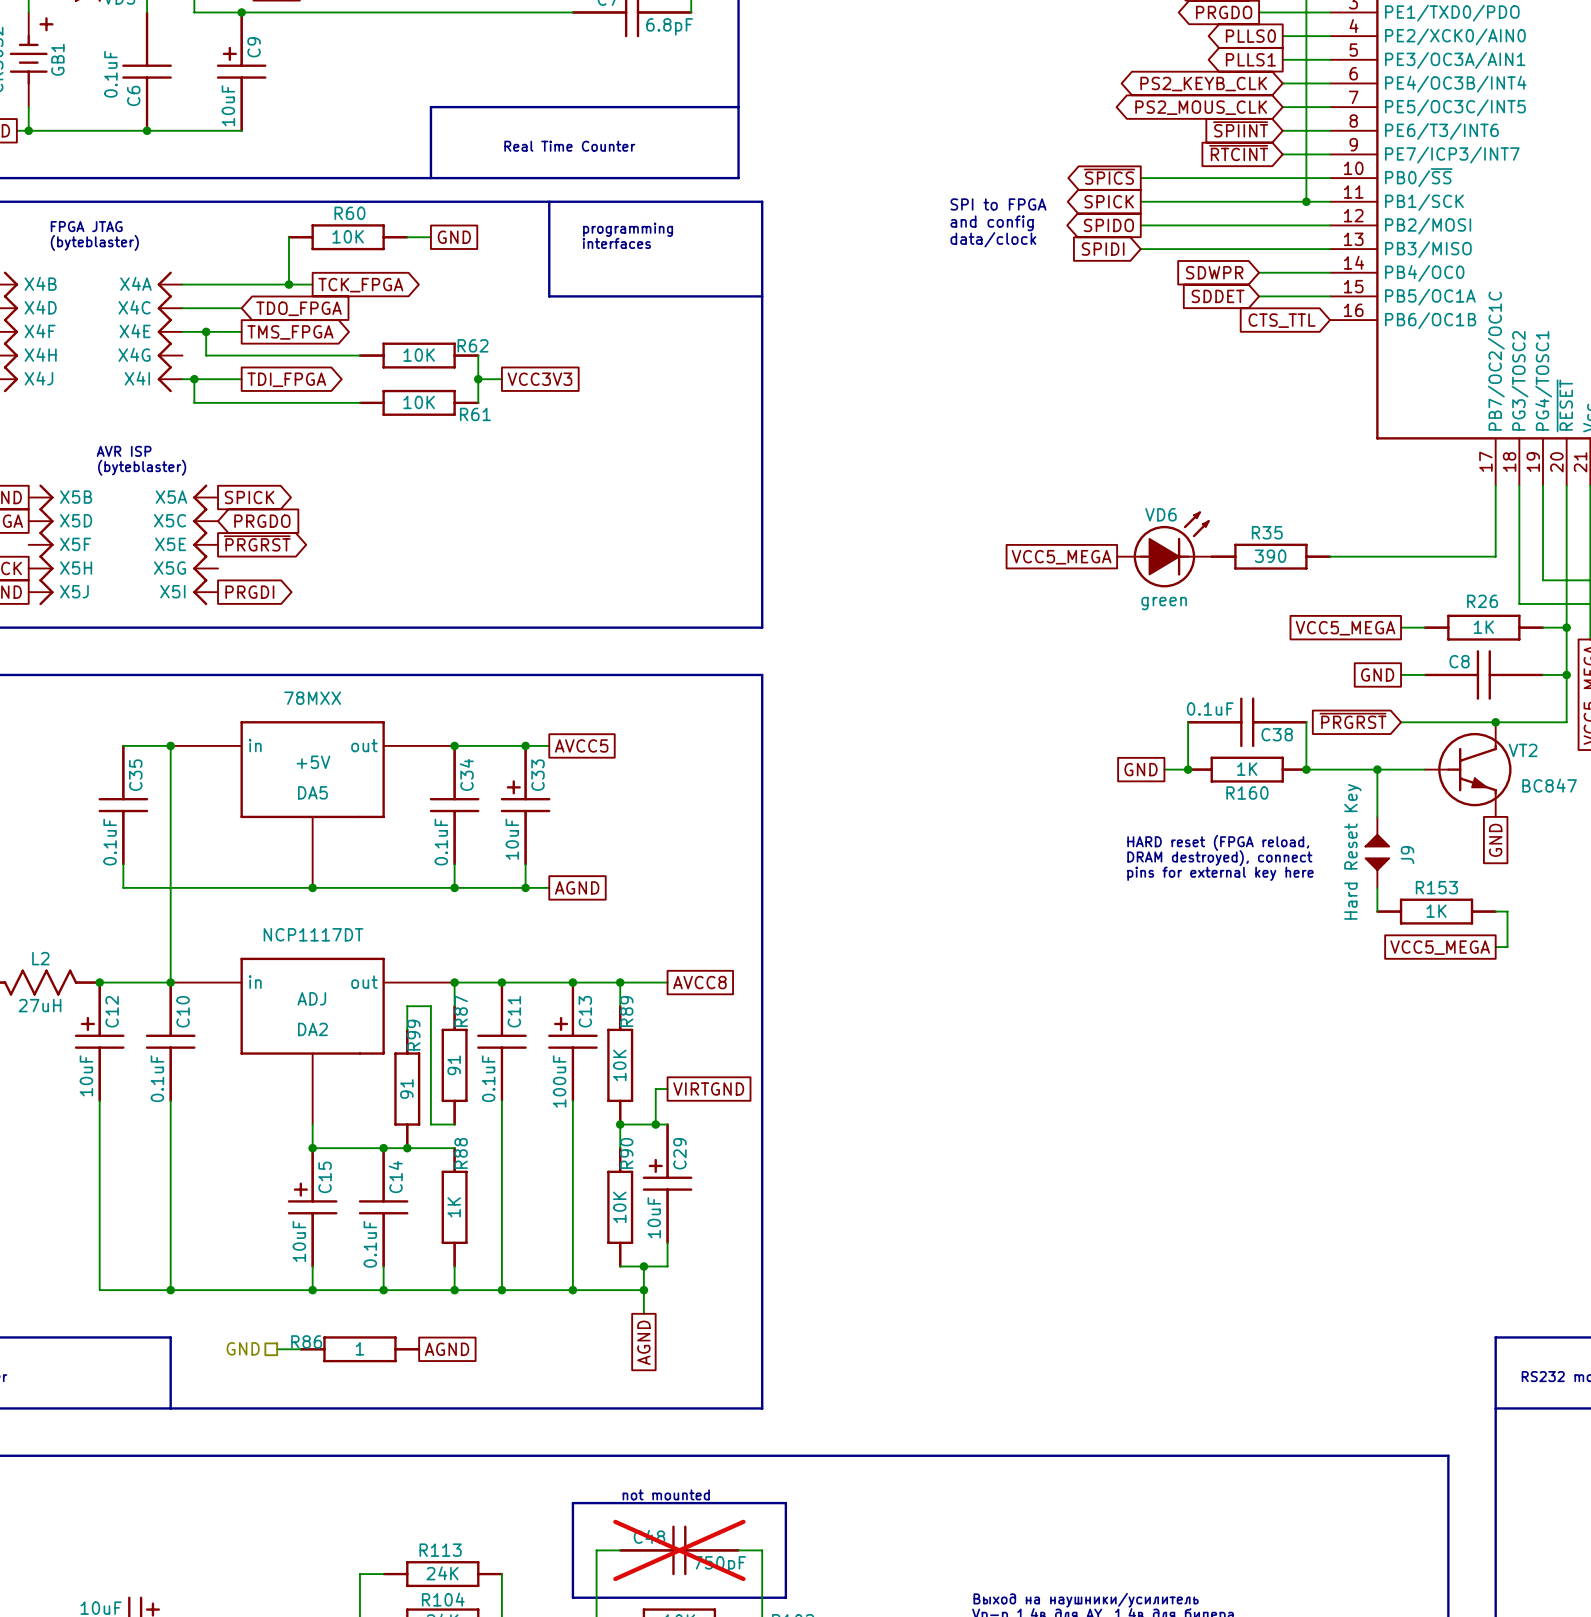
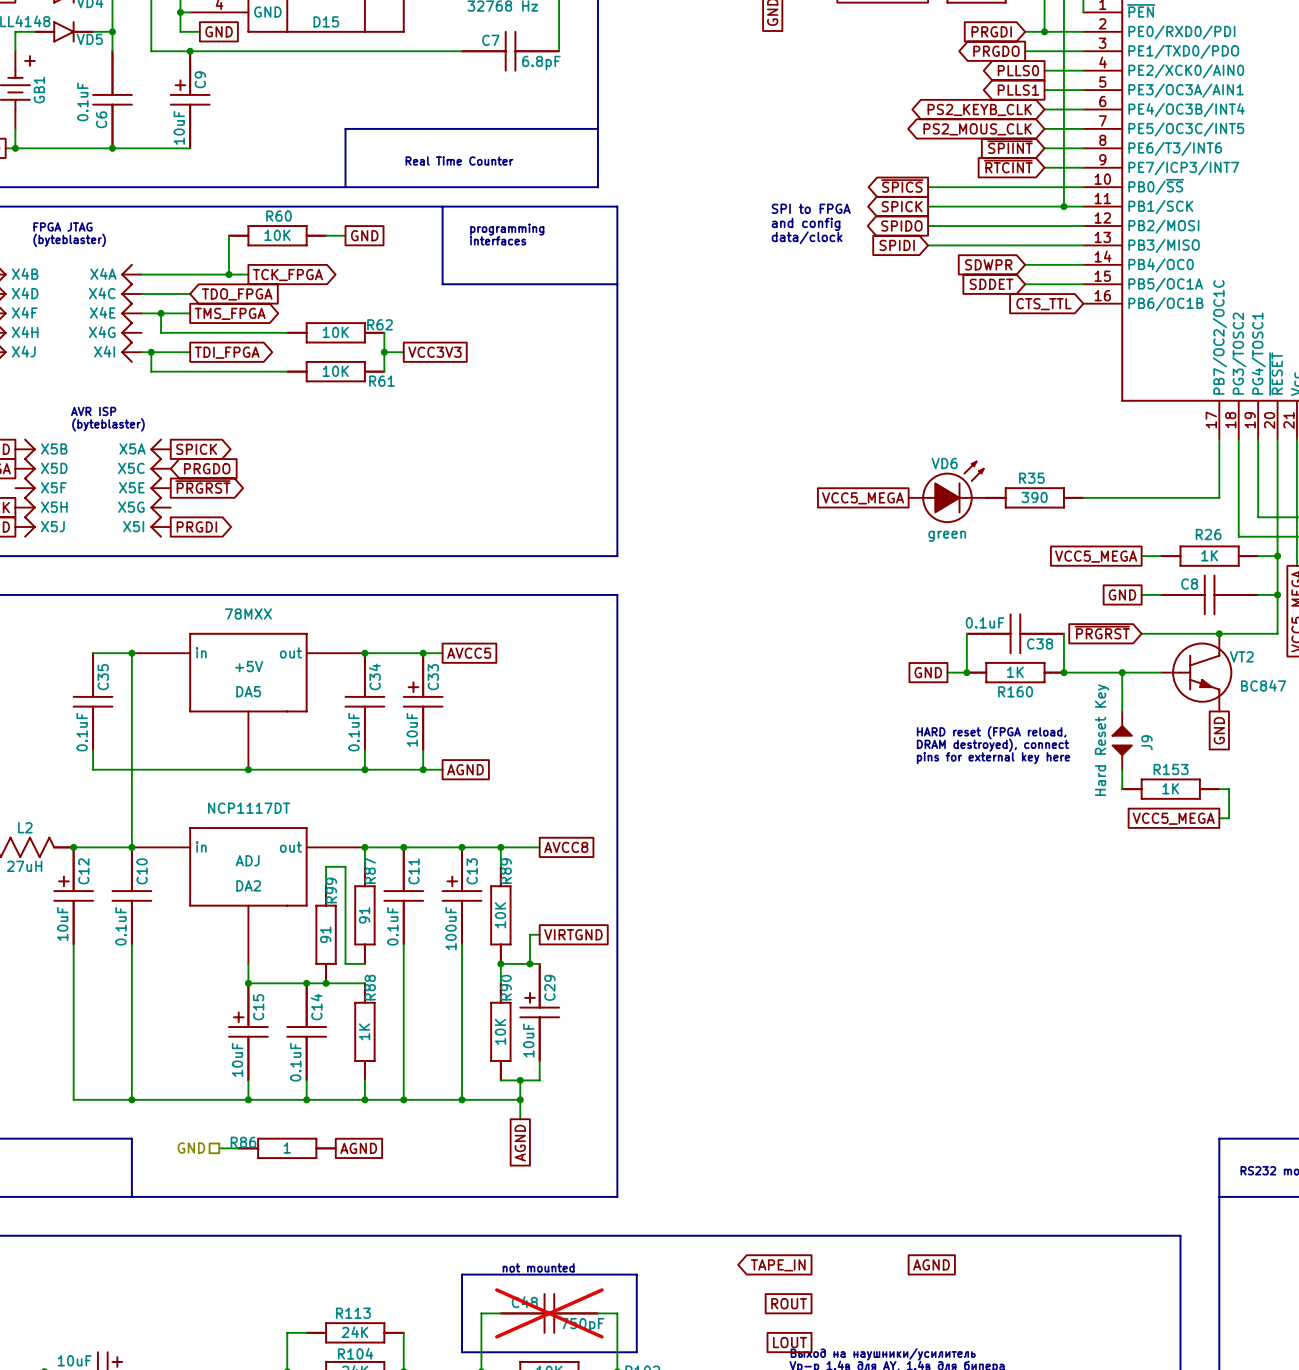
global label: none -> TAPE_IN (778, 1265)
global label: none -> AGND (931, 1264)
global label: none -> ROUT (789, 1303)
global label: none -> LOUT (790, 1342)

